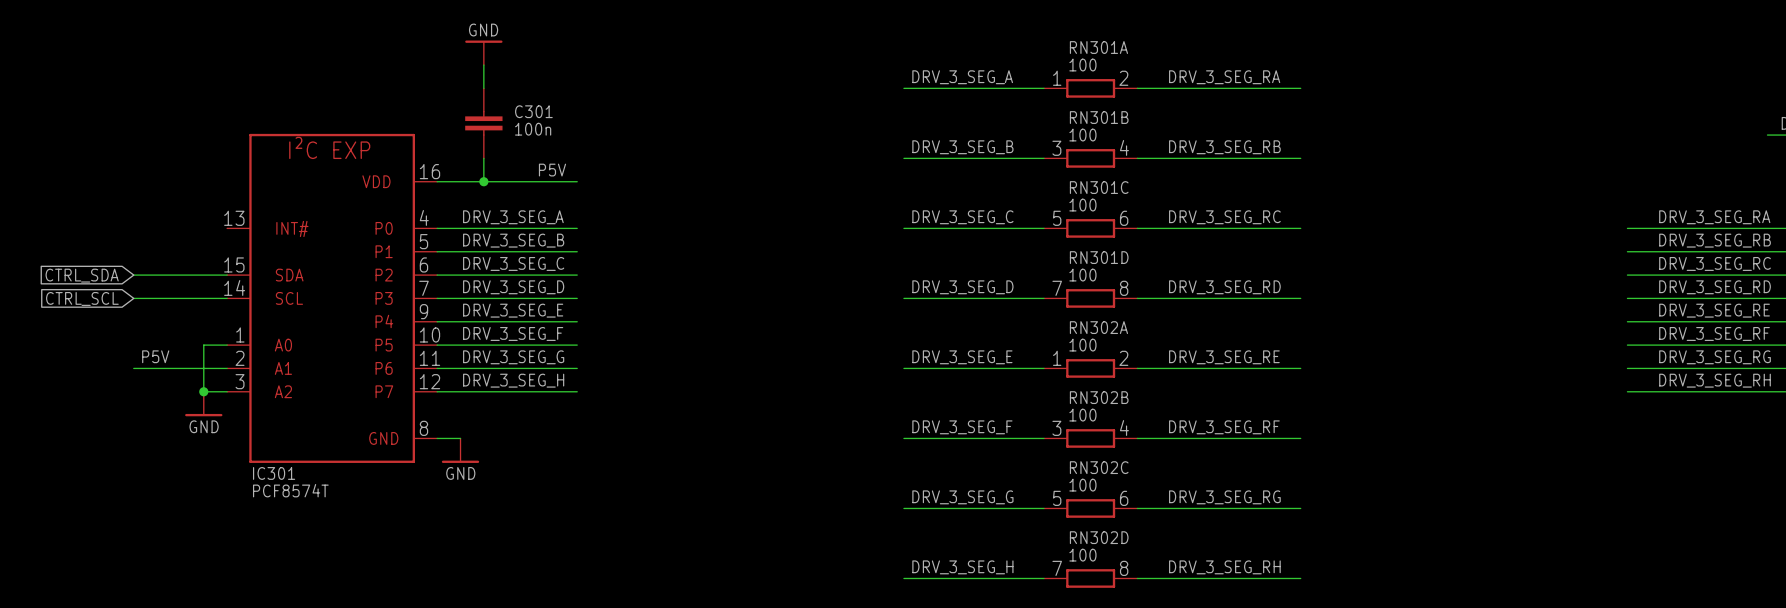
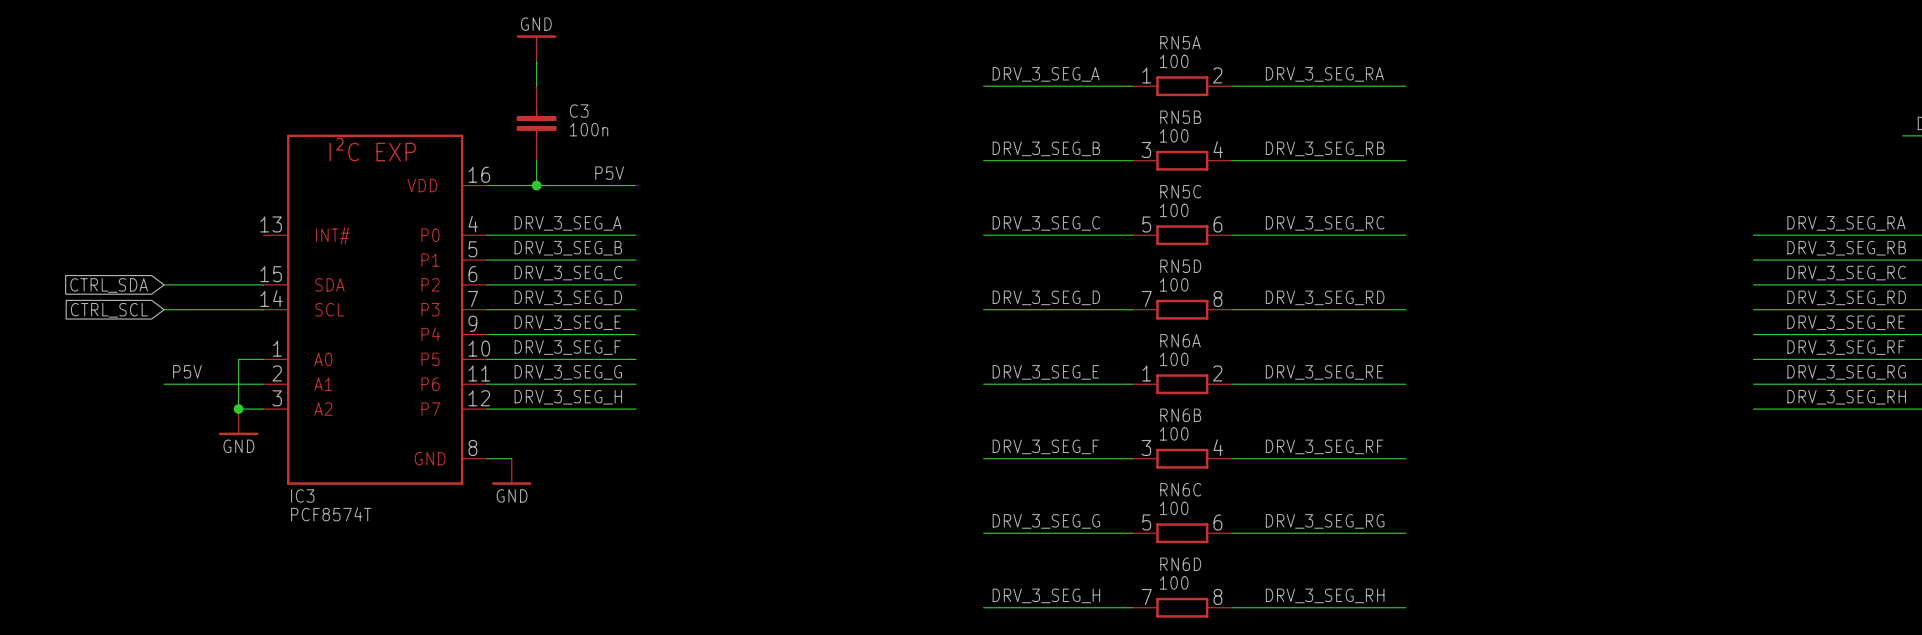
RN301A name: RN301A (1098, 47) -> RN5A (1180, 42)
C301 name: C301 (533, 111) -> C3 (579, 111)
RN301B name: RN301B (1099, 117) -> RN5B (1180, 117)
RN301C name: RN301C (1099, 187) -> RN5C (1180, 191)
RN301D name: RN301D (1099, 257) -> RN5D (1180, 266)
RN302A name: RN302A (1098, 327) -> RN6A (1180, 340)
RN302B name: RN302B (1099, 397) -> RN6B (1180, 415)
RN302C name: RN302C (1099, 467) -> RN6C (1180, 489)
IC301 name: IC301 (274, 473) -> IC3 (302, 495)
RN302D name: RN302D (1099, 537) -> RN6D (1180, 564)

